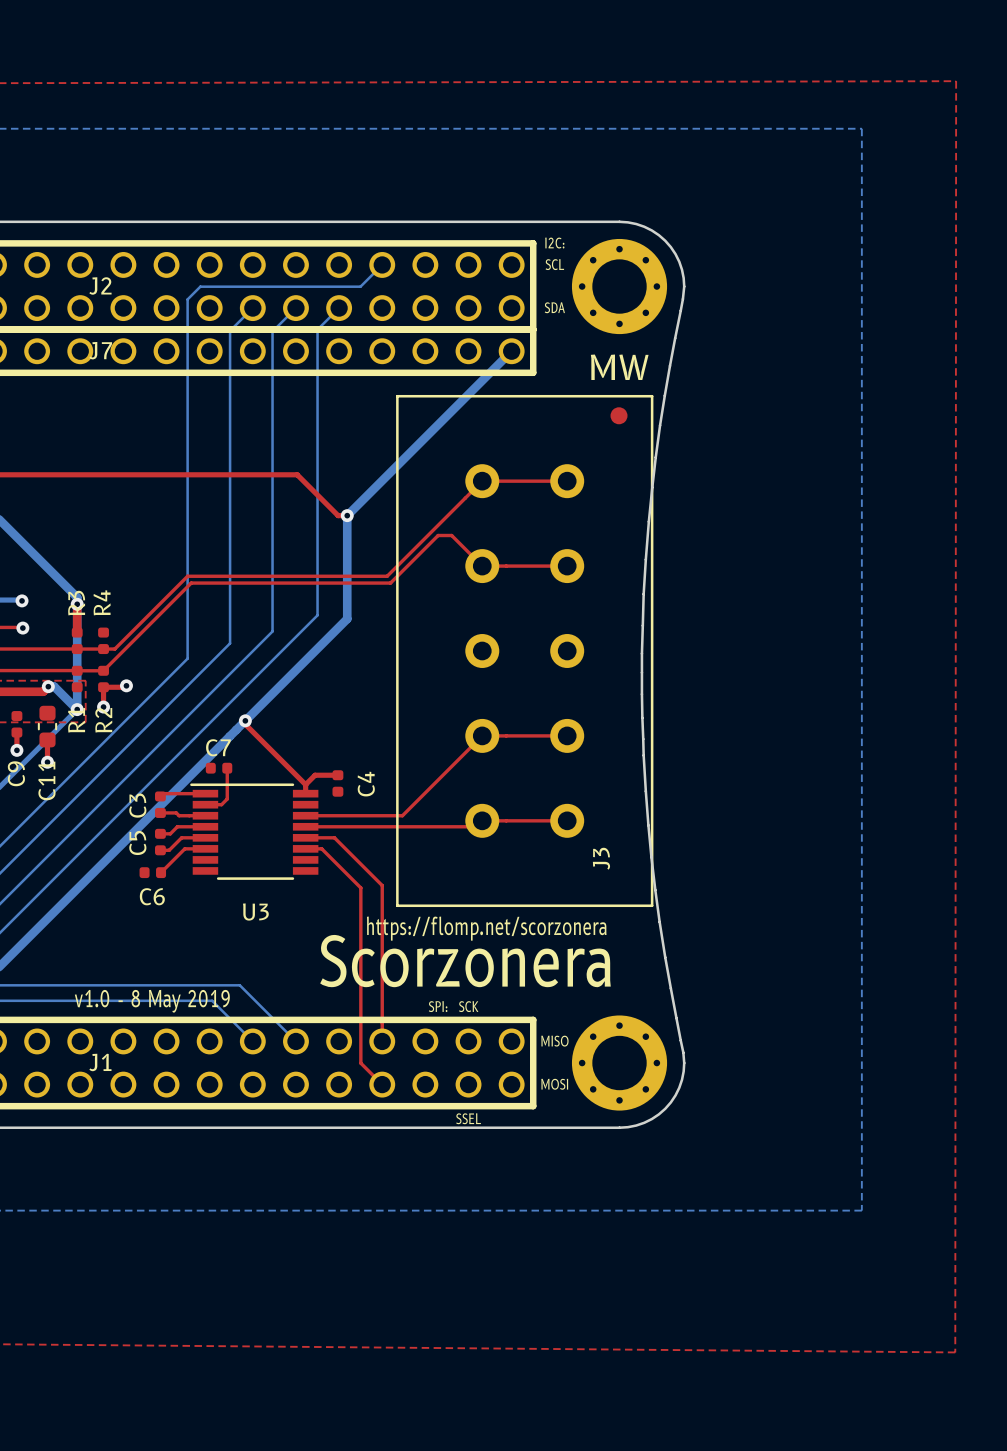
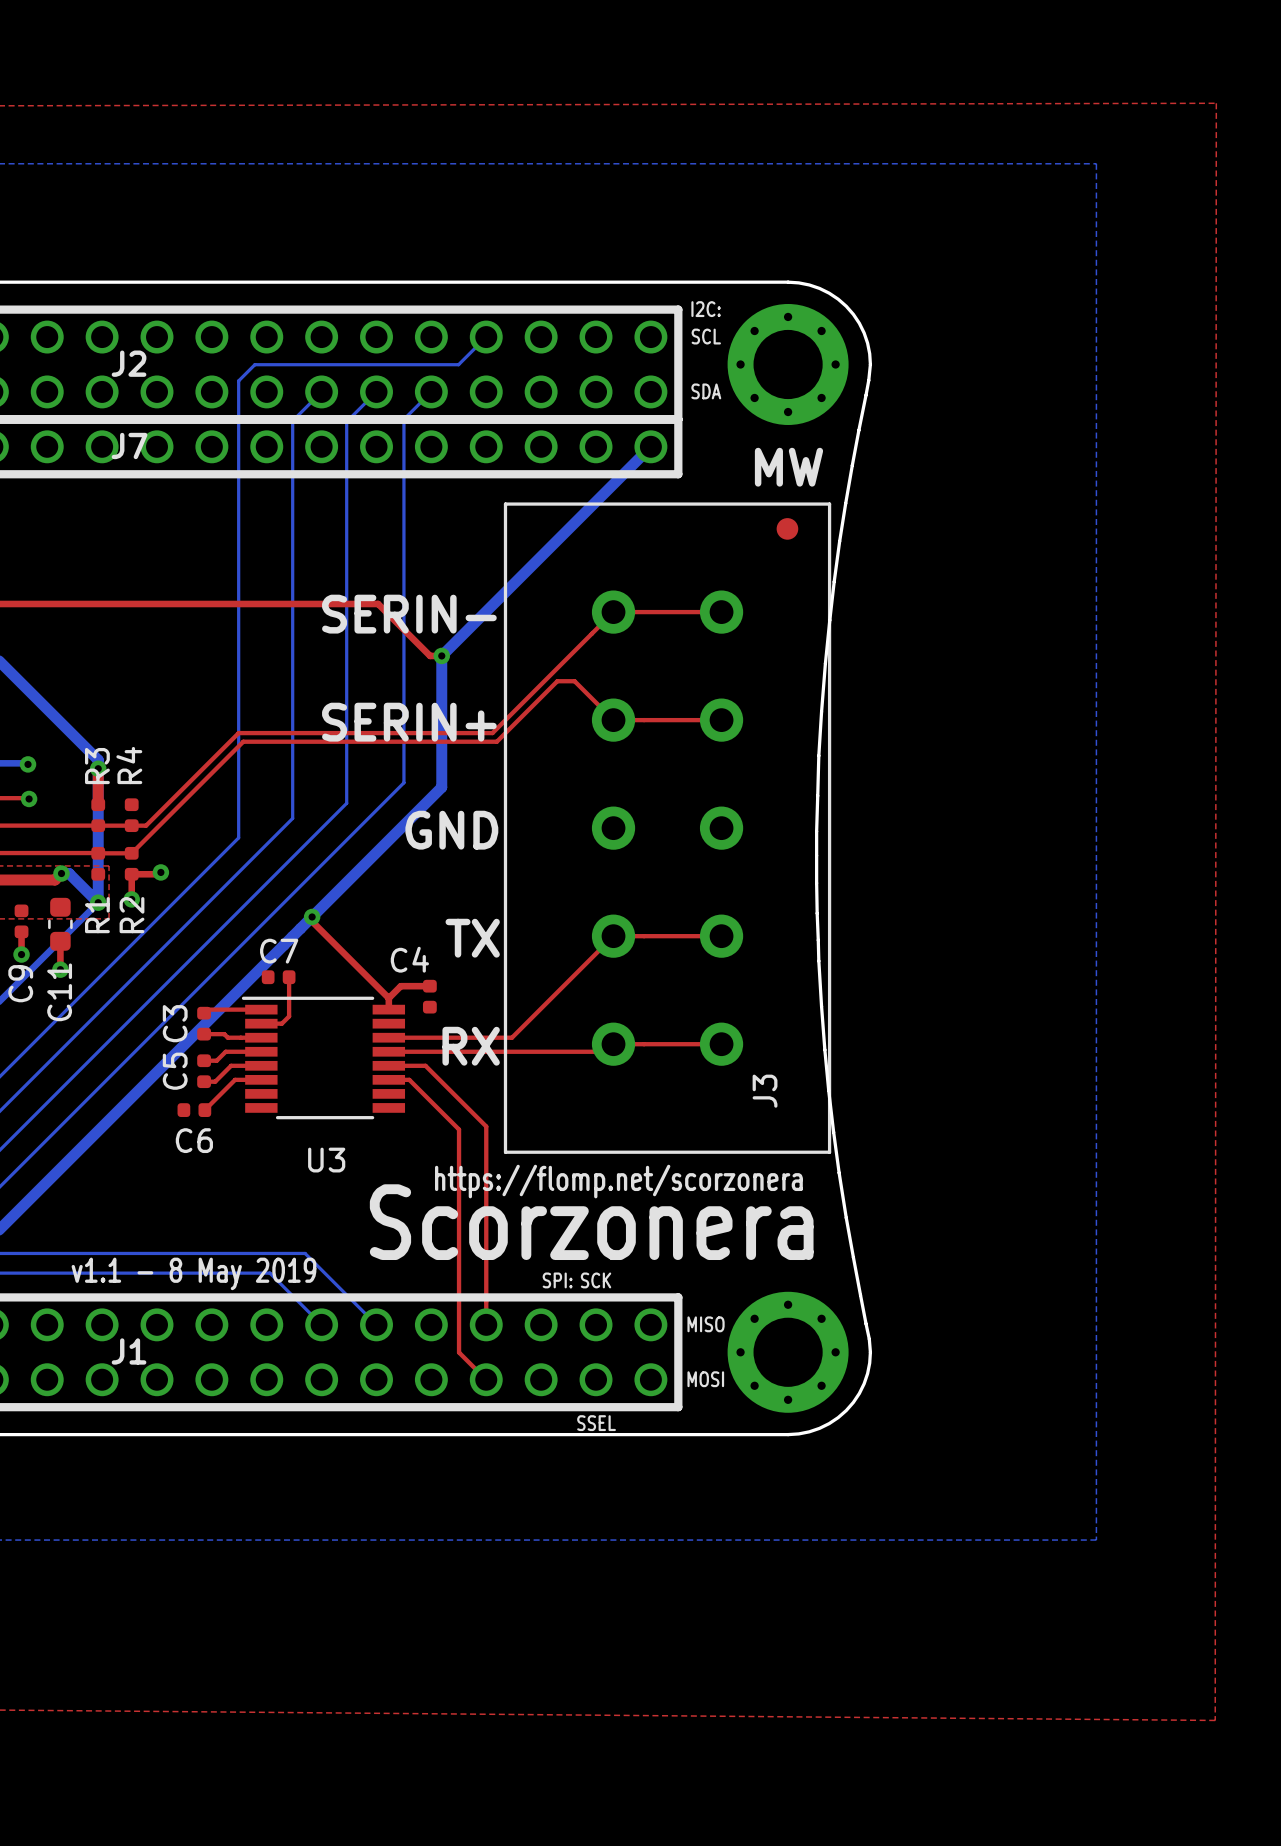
text: none -> SERIN- (409, 614)
text: none -> SERIN+ (409, 722)
text: none -> GND (451, 830)
text: none -> TX (472, 938)
C4 name rotation: 0° (366, 784) -> 90° clockwise (409, 959)
C4 name position: C4 (366, 784) -> C4 (409, 959)
text: none -> RX (471, 1046)
text: v1.0 - 8 May 2019 (152, 1001) -> v1.1 - 8 May 2019 (193, 1273)

